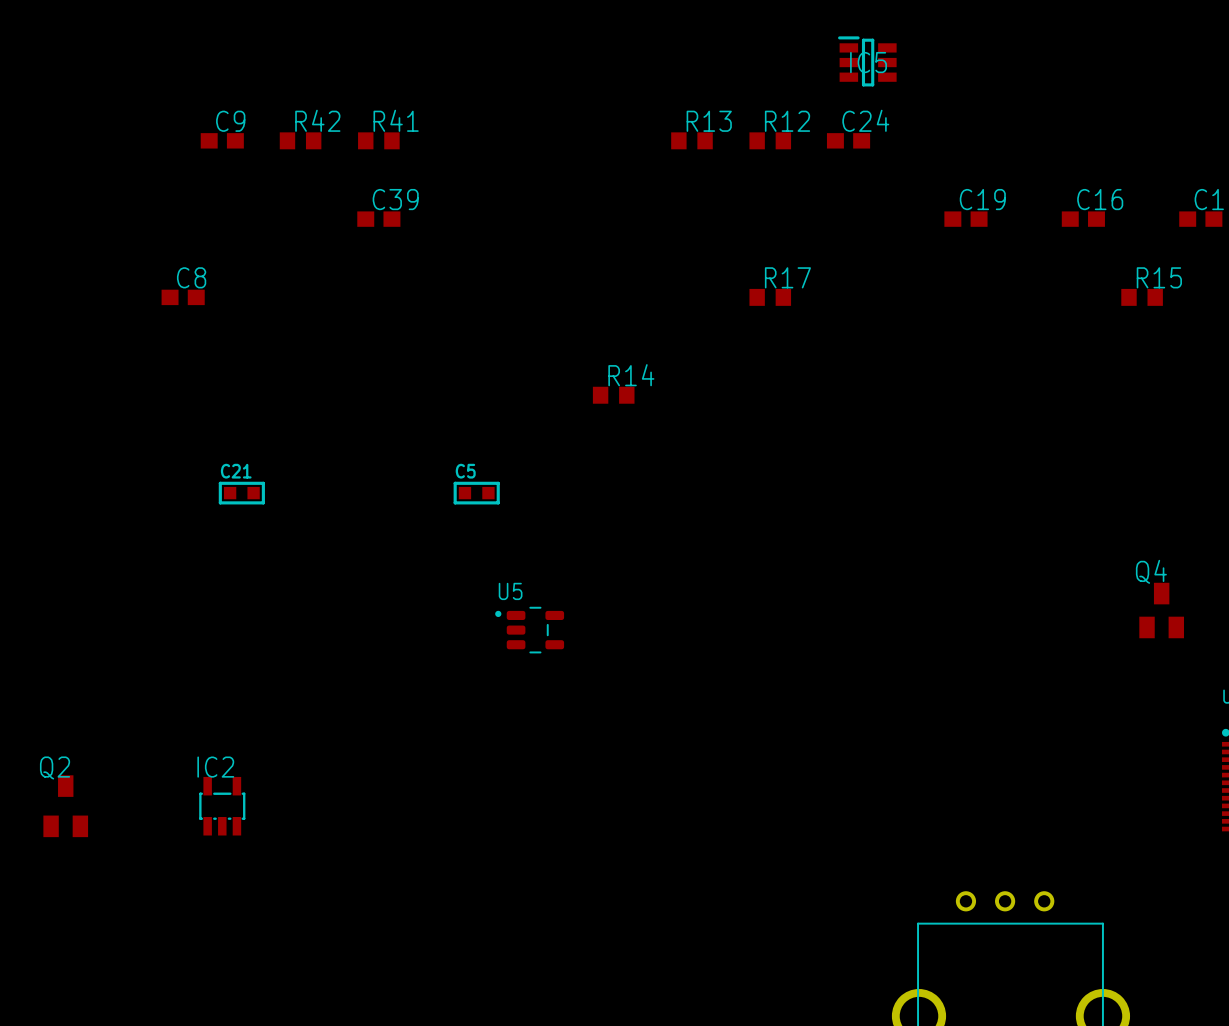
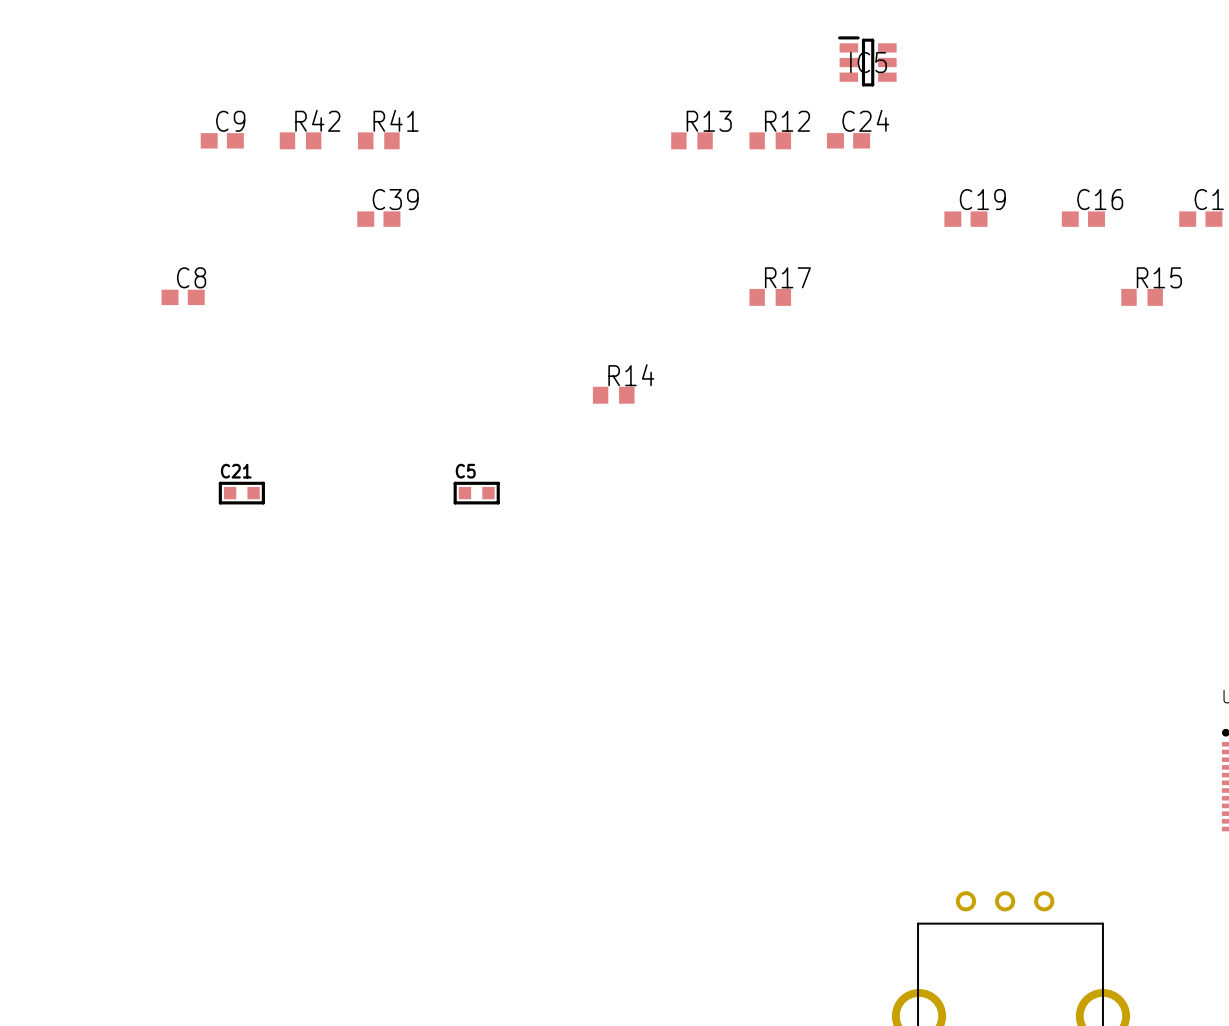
Q4: (1161, 610) -> none
U5: (529, 630) -> none
Q2: (65, 806) -> none
IC2: (222, 806) -> none

